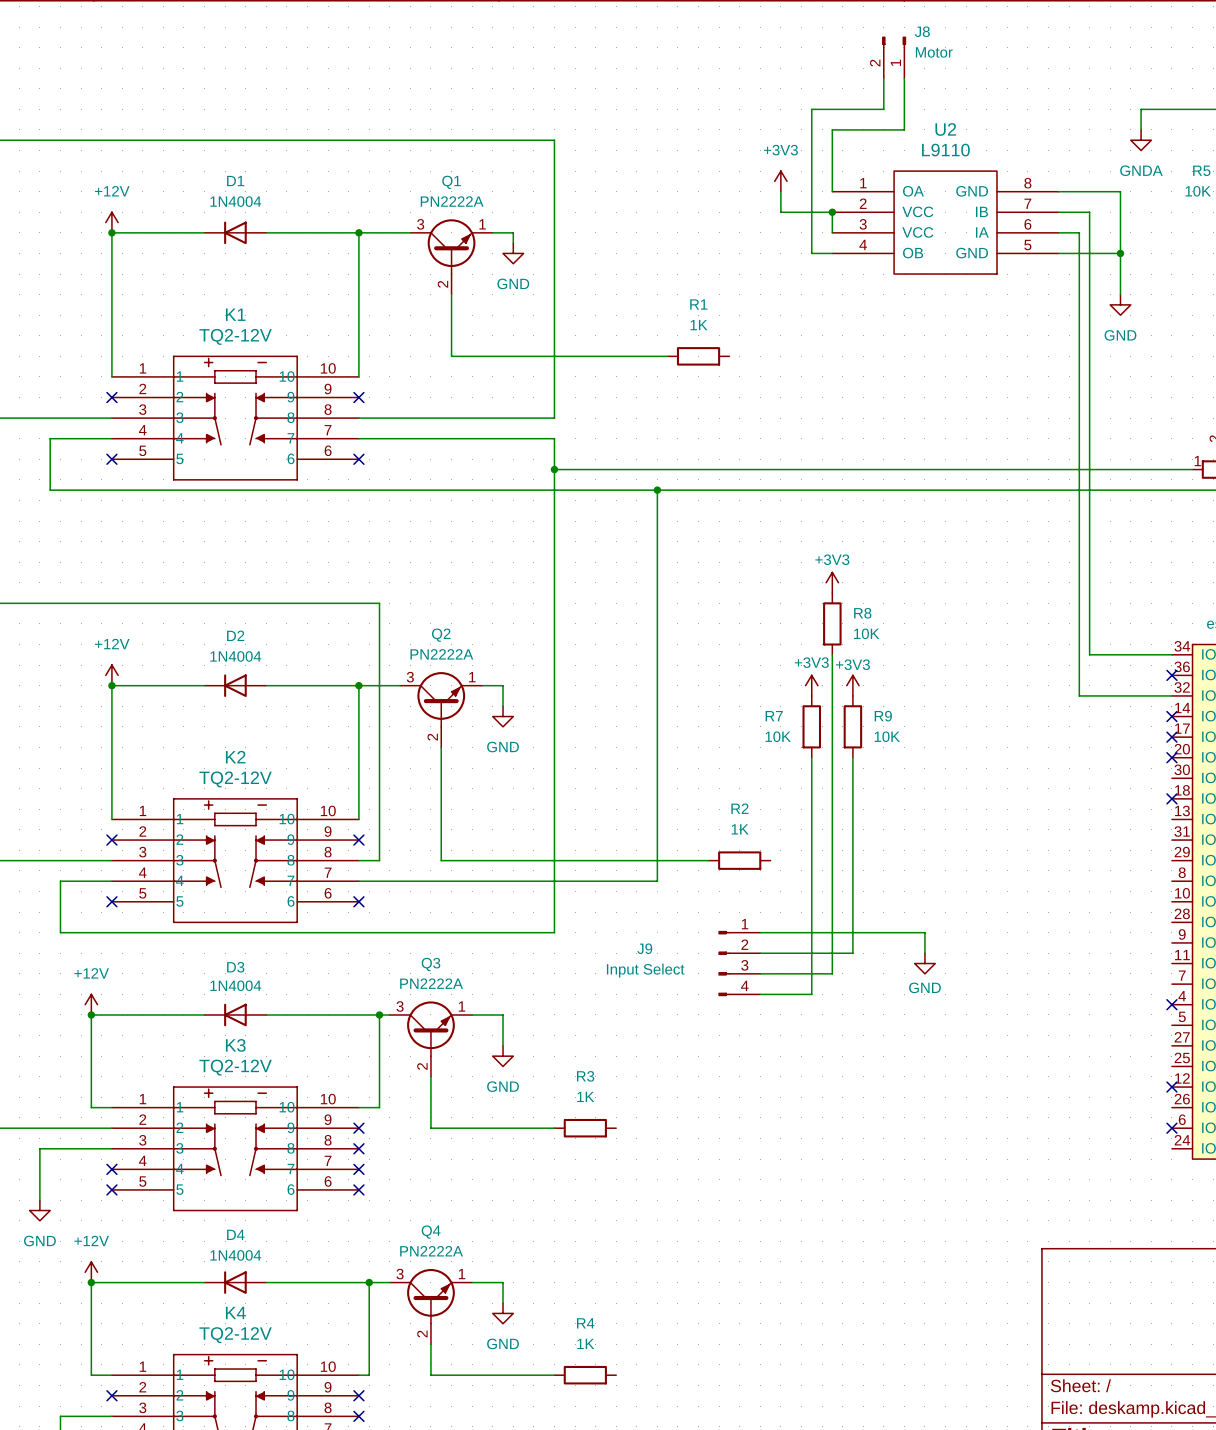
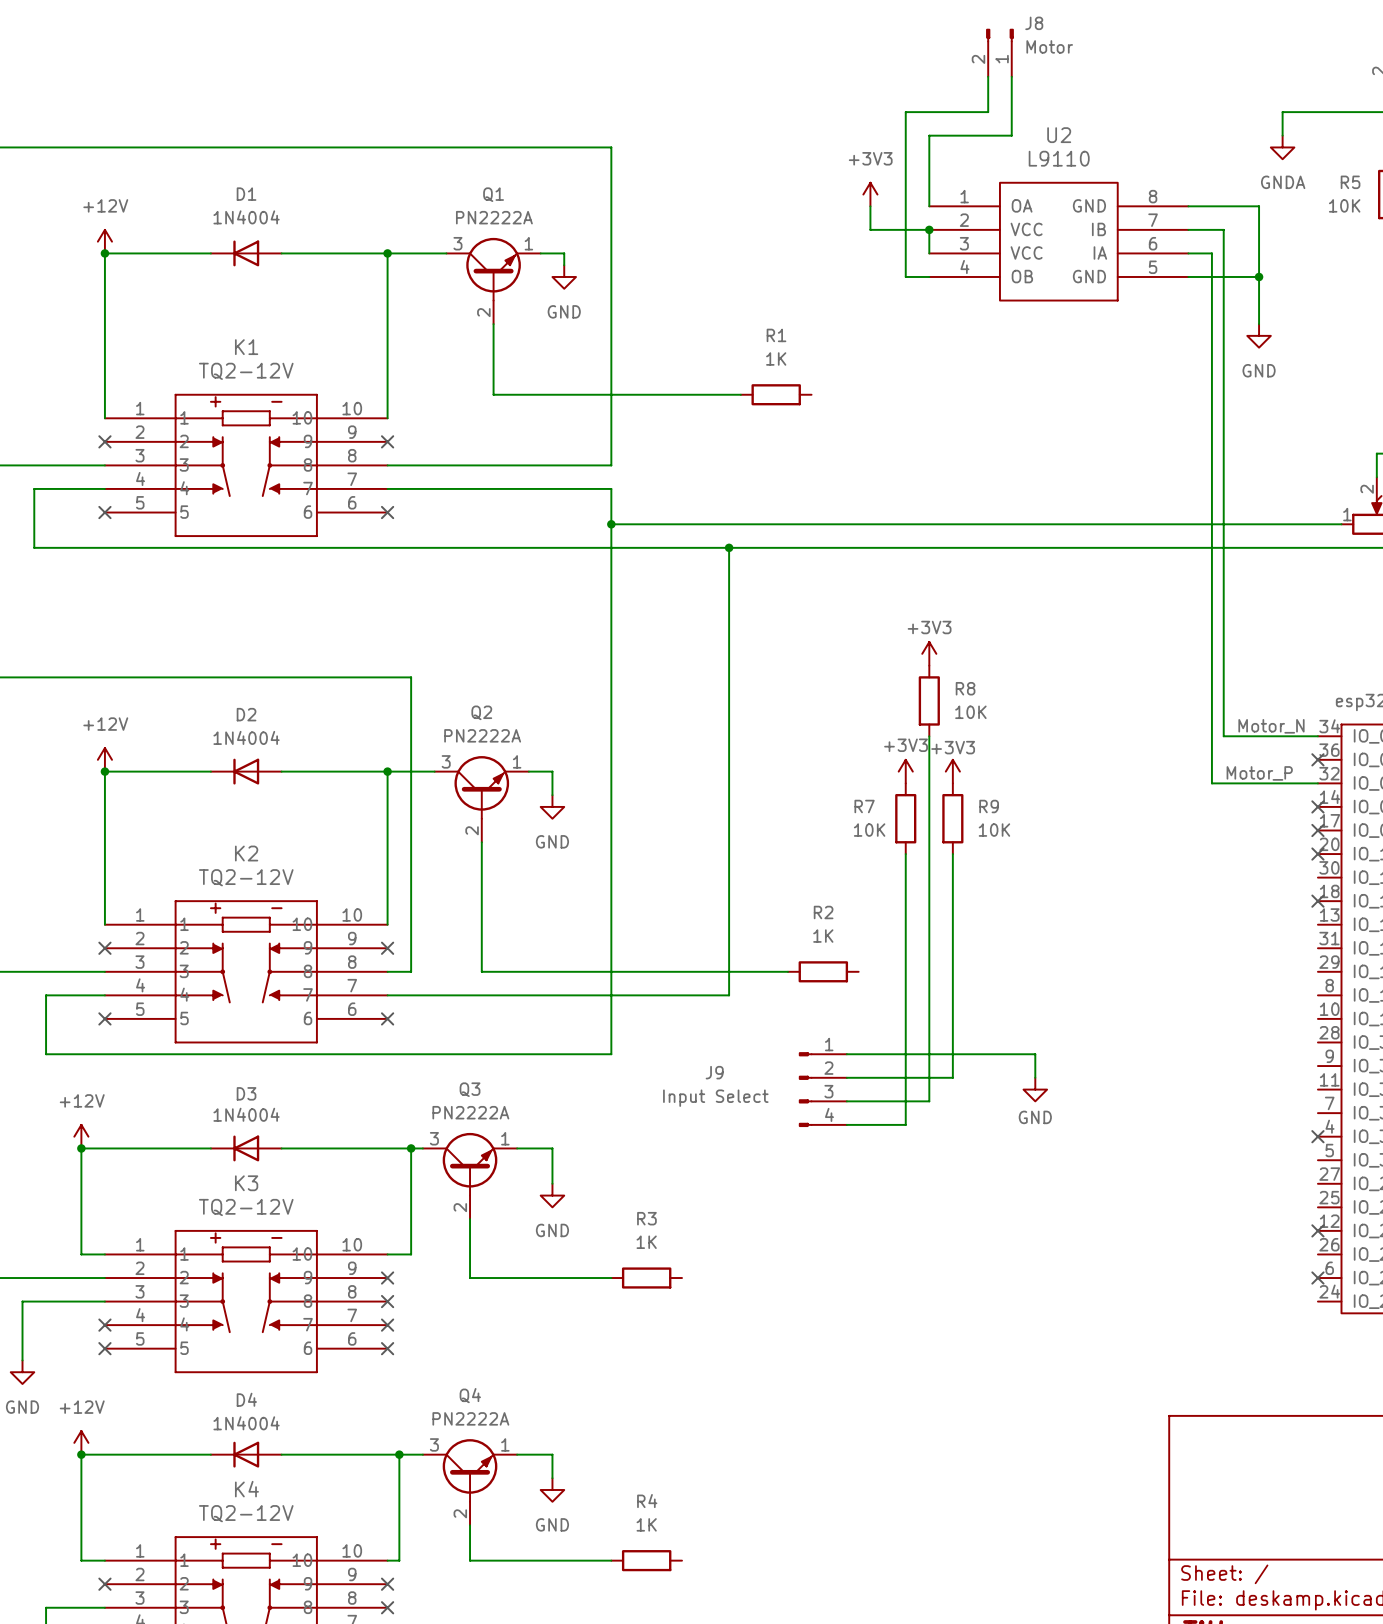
label: none -> Motor_N (1271, 726)
label: none -> Motor_P (1259, 773)

